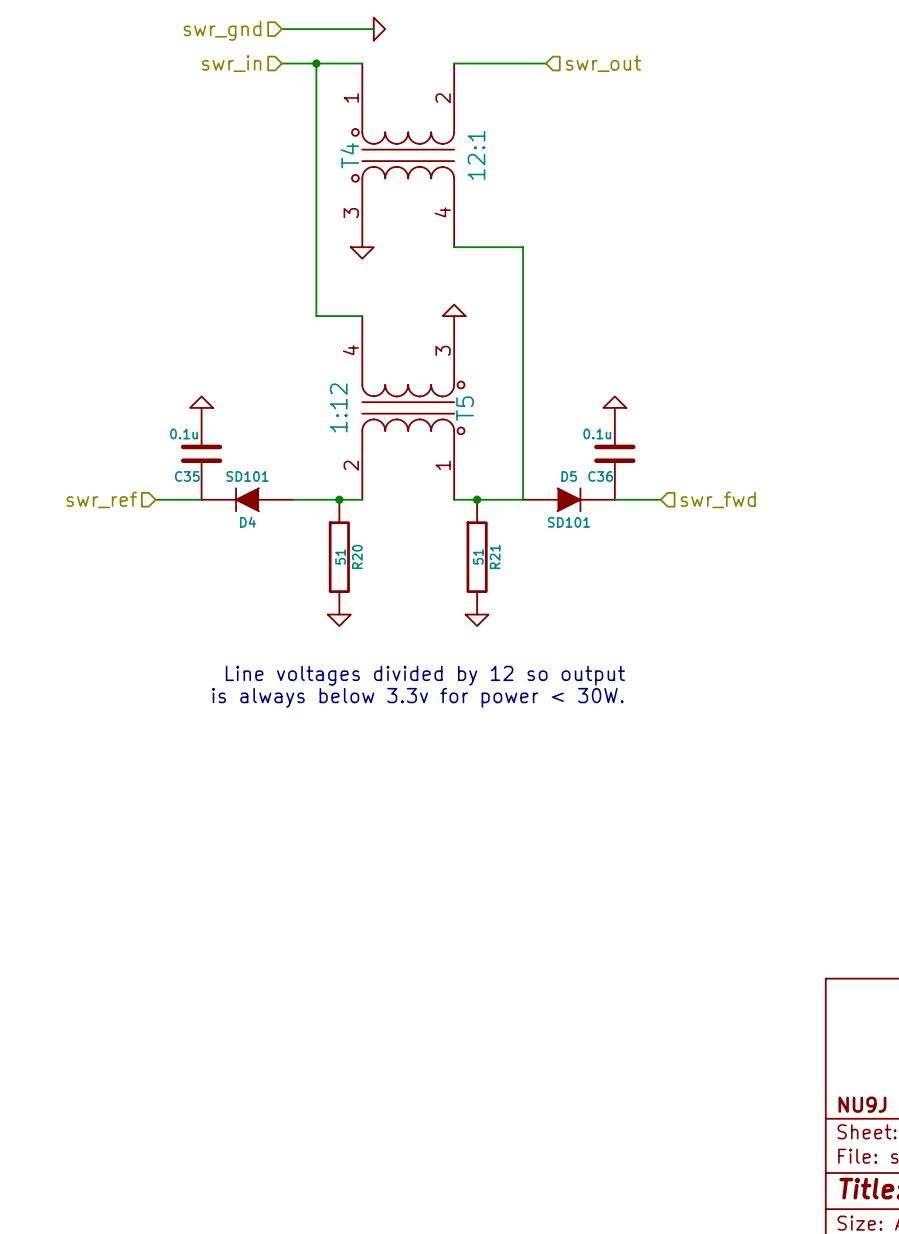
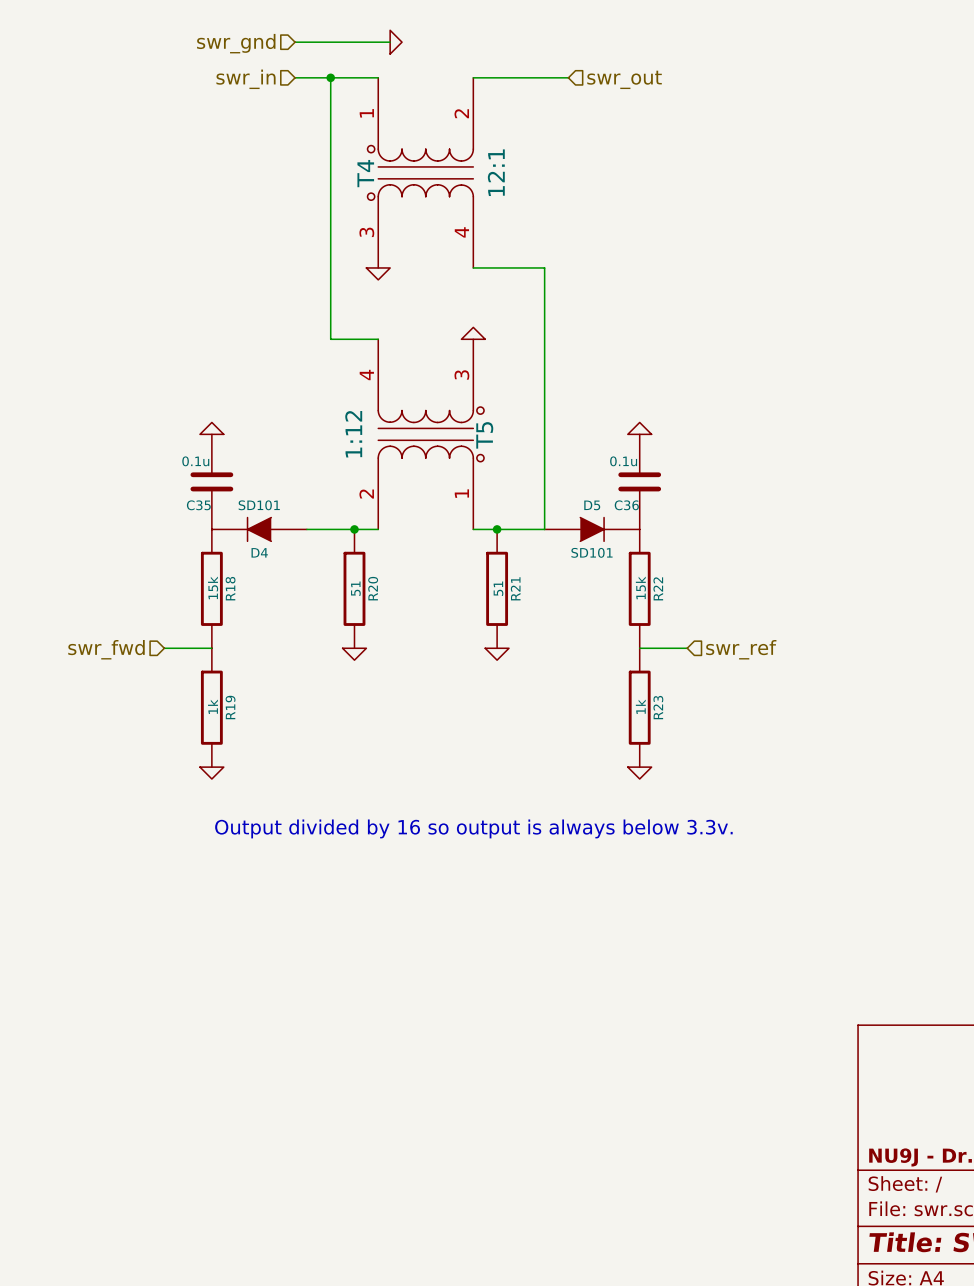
hierarchical label: swr_ref (101, 499) -> none
wire: (155, 499) (201, 499) -> (164, 648) (211, 648)
wire: (614, 499) (660, 499) -> (639, 648) (687, 648)
hierarchical label: swr_fwd (718, 499) -> none
R18: none -> 15k (211, 588)
R22: none -> 15k (639, 588)
hierarchical label: none -> swr_fwd (106, 649)
hierarchical label: none -> swr_ref (741, 649)
R19: none -> 1k (211, 707)
R23: none -> 1k (639, 707)
text: Line voltages divided by 12 so output (425, 675) -> none
text: is always below 3.3v for power < 30W. (417, 697) -> none
power symbol: none -> (211, 773)
power symbol: none -> (639, 773)
text: none -> Output divided by 16 so output is always below 3.3v. (473, 828)

